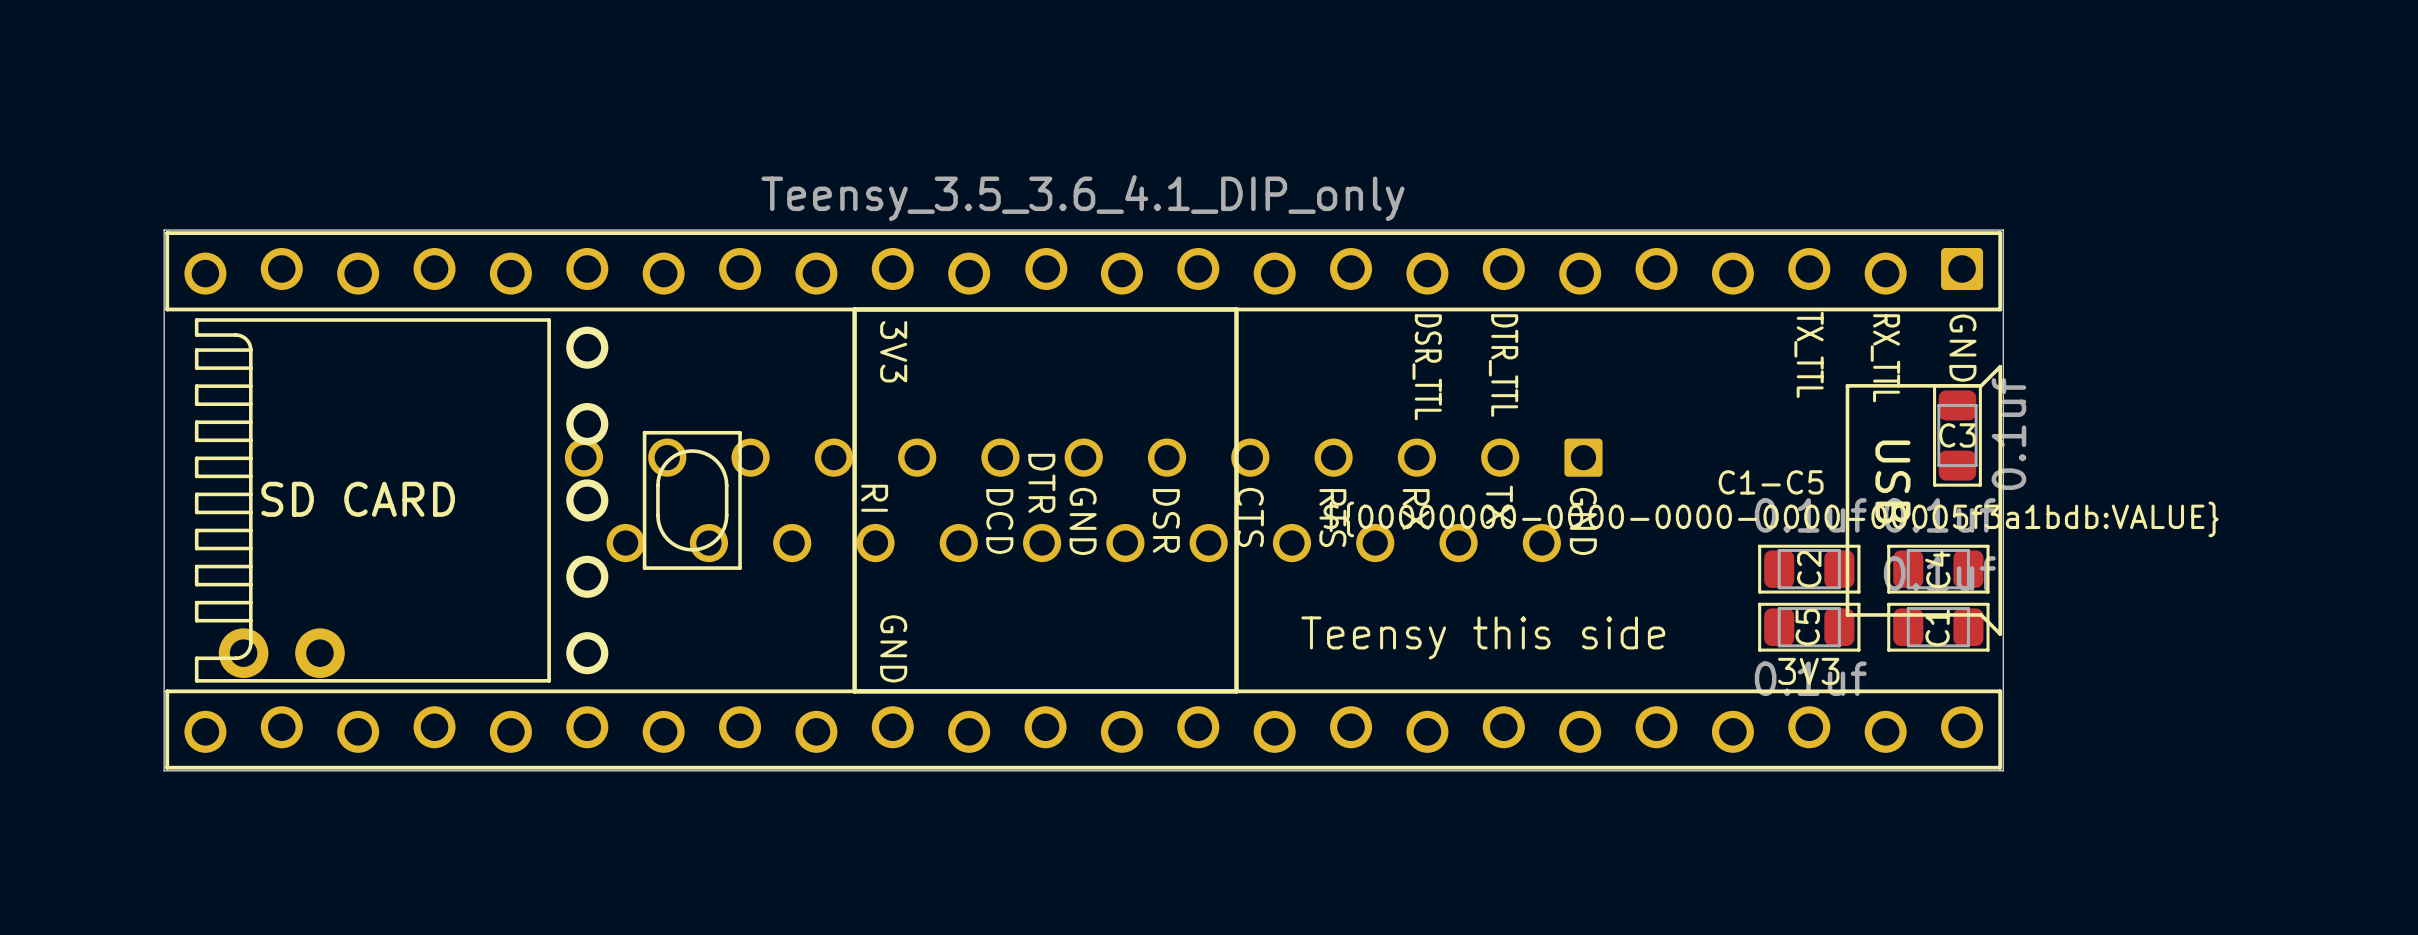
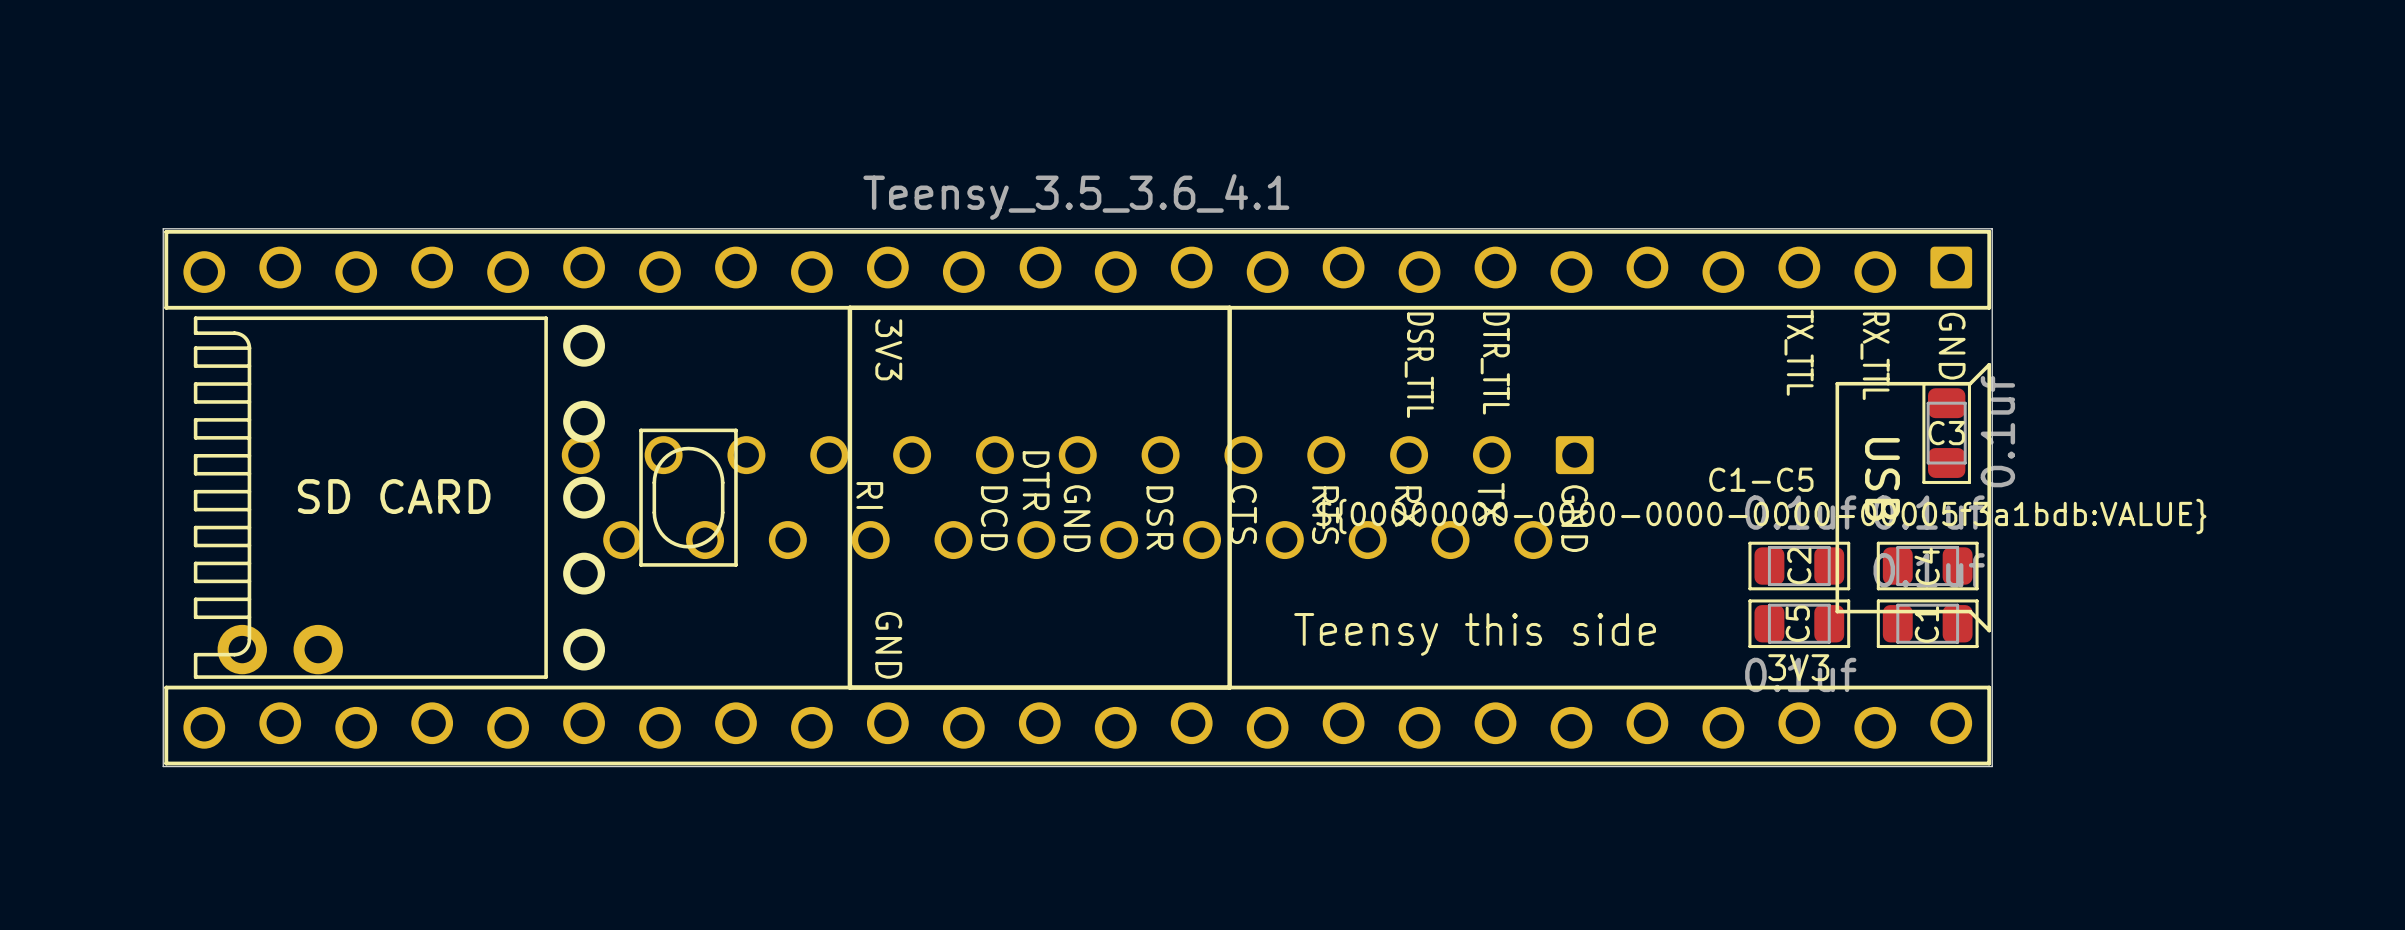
part value: Teensy_3.5_3.6_4.1_DIP_only (1083, 198) -> Teensy_3.5_3.6_4.1 (1076, 196)
text position: SD CARD (358, 499) -> SD CARD (394, 496)

